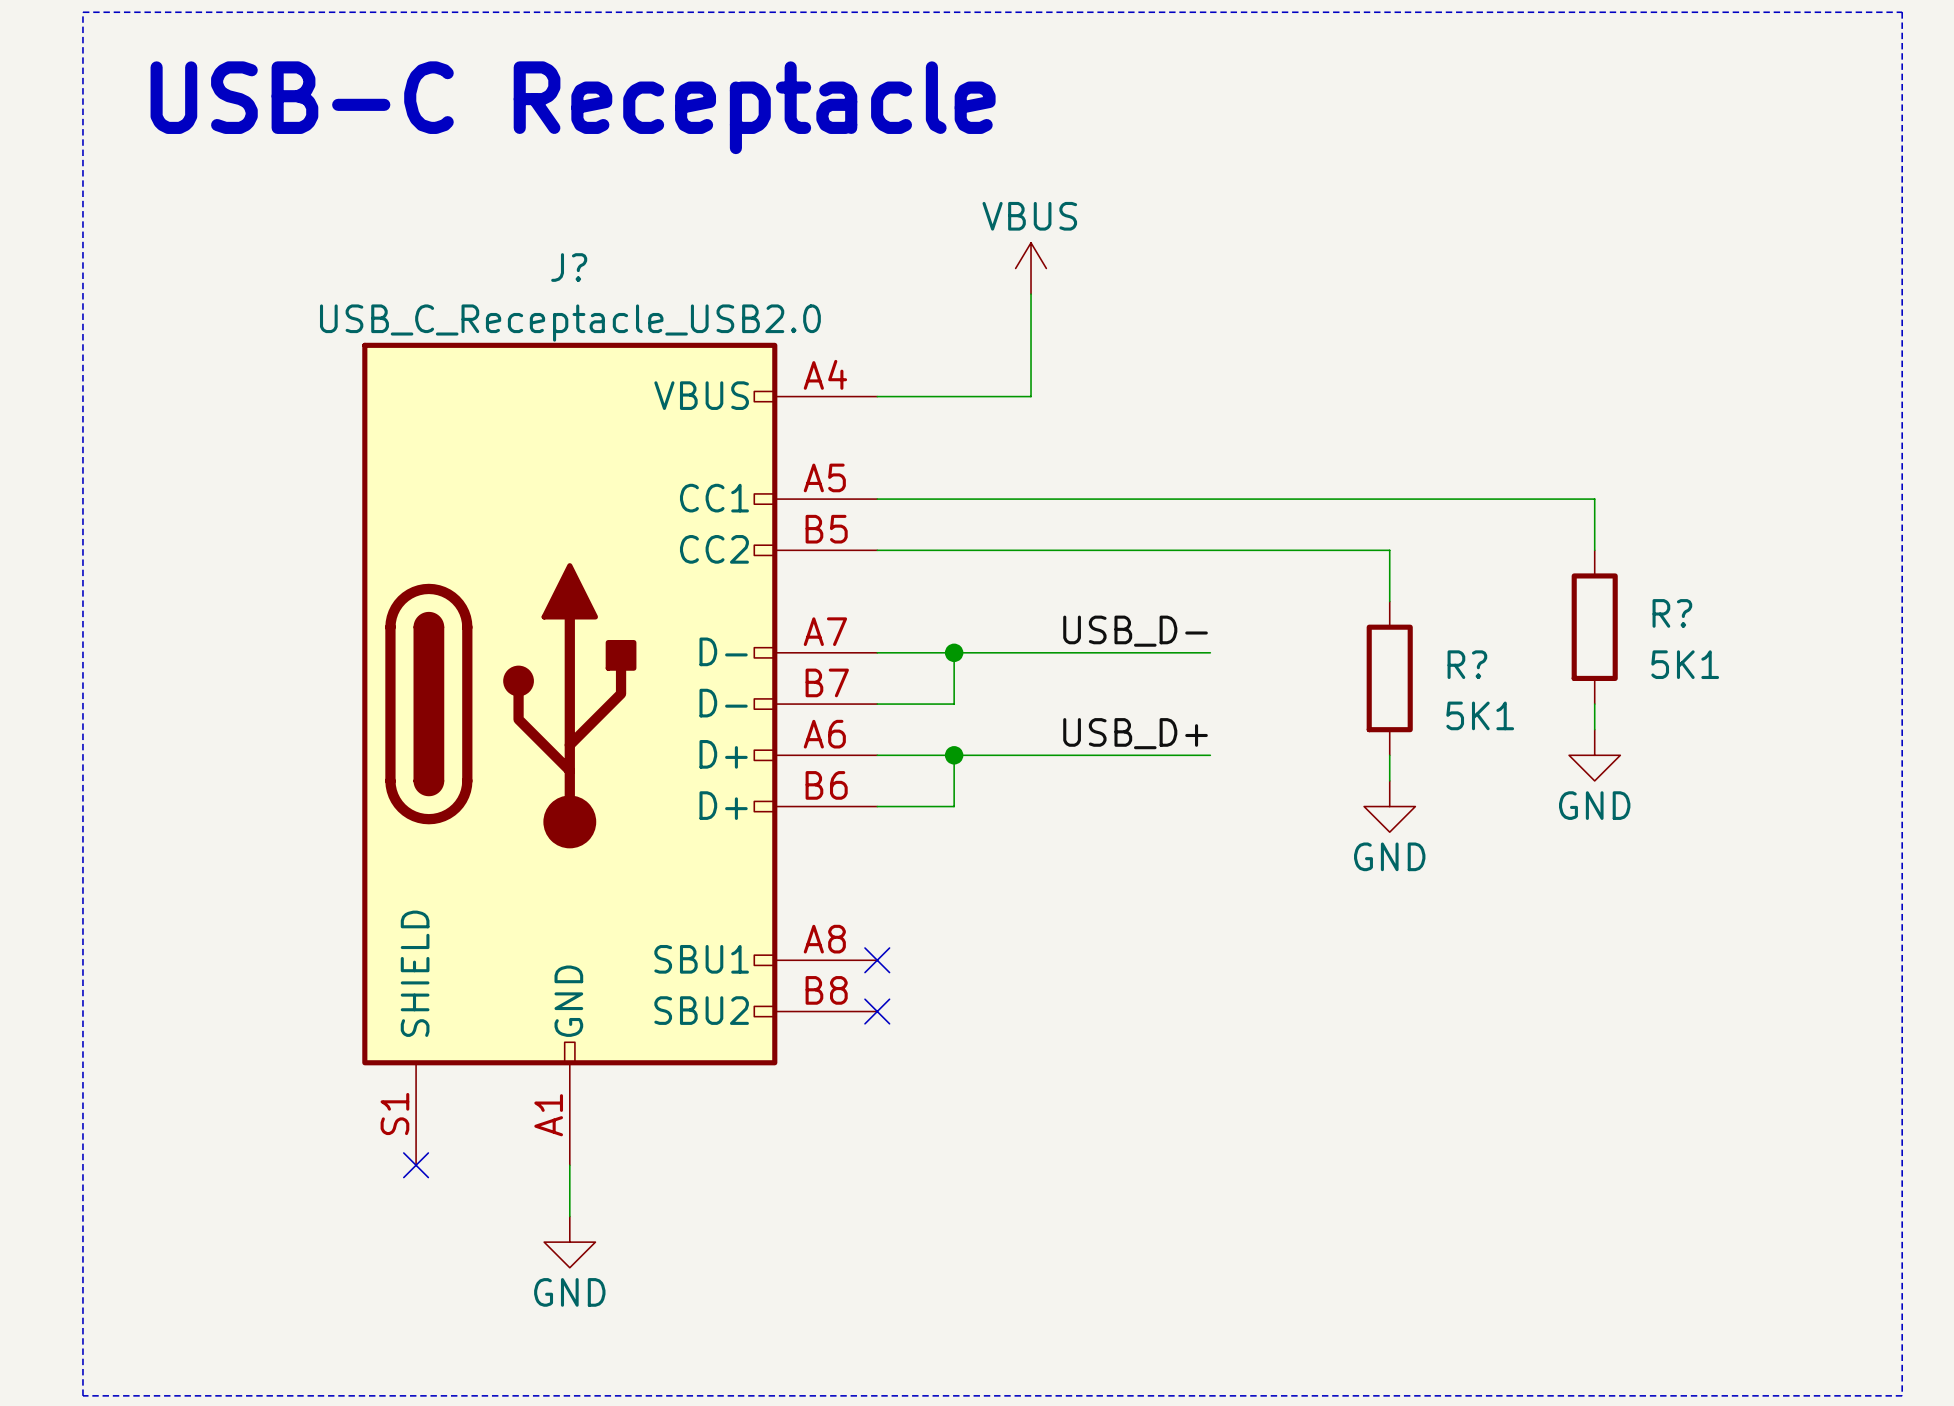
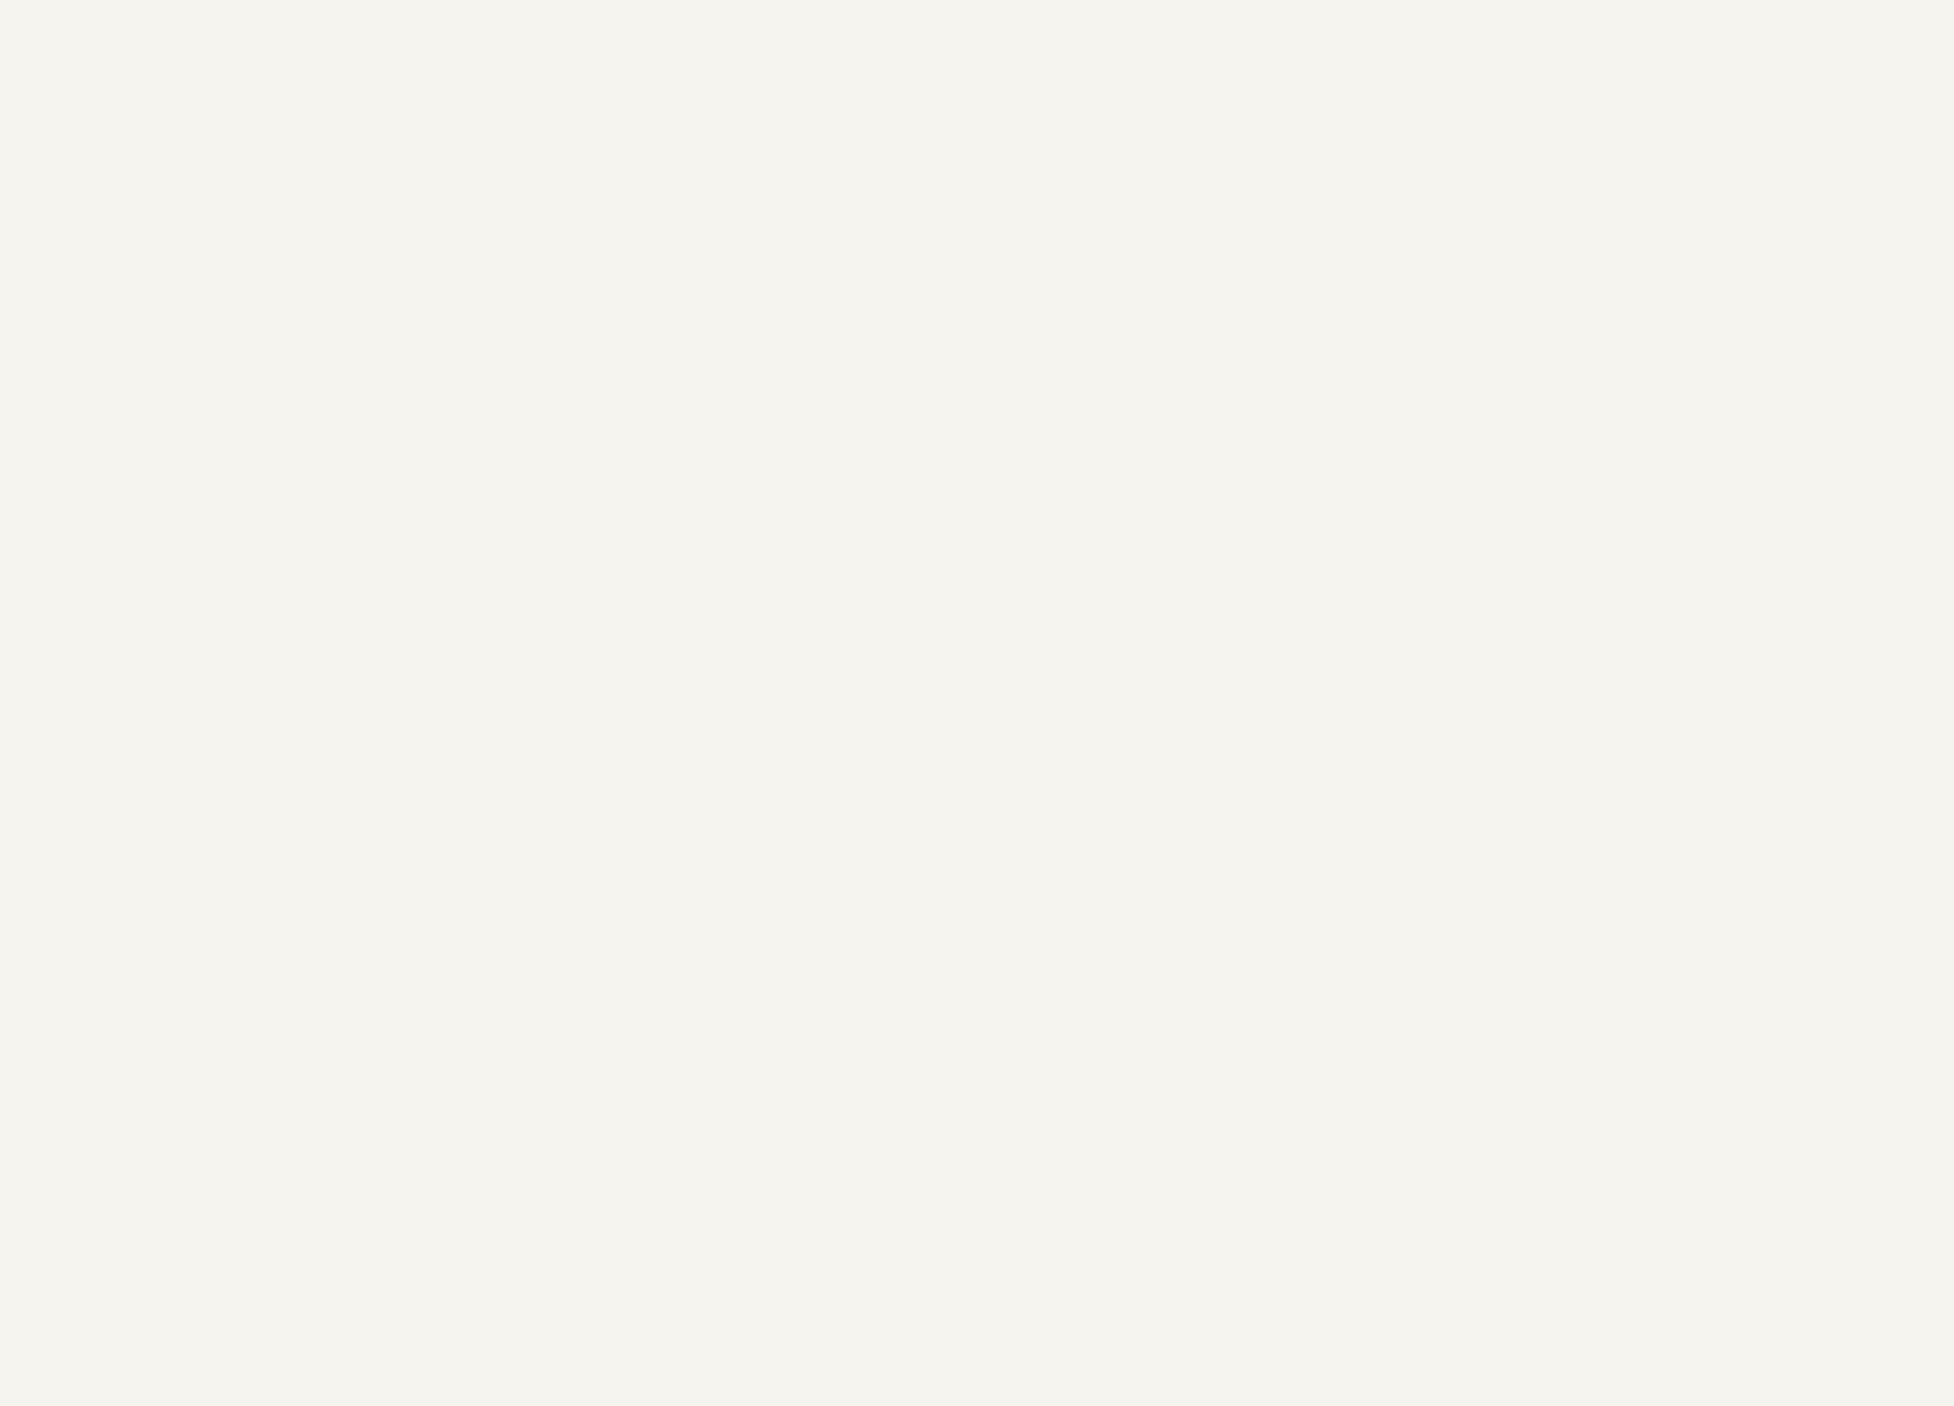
line: (82, 12) (1902, 12) (1902, 1395) (82, 1395) (82, 12) -> none
text: USB-C Receptacle (573, 107) -> none
power symbol: VBUS (1031, 268) -> none
wire: (1031, 294) (1031, 396) (877, 396) -> none
wire: (877, 499) (1594, 499) (1594, 550) -> none
wire: (877, 550) (1389, 550) (1389, 601) -> none
R?: 5K1 (1594, 627) -> none
label: USB_D- (1135, 631) -> none
wire: (877, 652) (1210, 652) -> none
wire: (954, 652) (954, 704) (877, 704) -> none
junction: (954, 652) -> none
R?: 5K1 (1389, 678) -> none
wire: (1594, 704) (1594, 729) -> none
label: USB_D+ (1135, 733) -> none
J?: USB_C_Receptacle_USB2.0 (619, 754) -> none
wire: (877, 755) (1210, 755) -> none
wire: (954, 755) (954, 806) (877, 806) -> none
junction: (954, 755) -> none
wire: (1389, 755) (1389, 780) -> none
power symbol: GND (1594, 755) -> none
power symbol: GND (1389, 806) -> none
no-connect mark: (877, 960) -> none
no-connect mark: (877, 1011) -> none
no-connect mark: (416, 1165) -> none
wire: (569, 1165) (569, 1216) -> none
power symbol: GND (569, 1242) -> none

